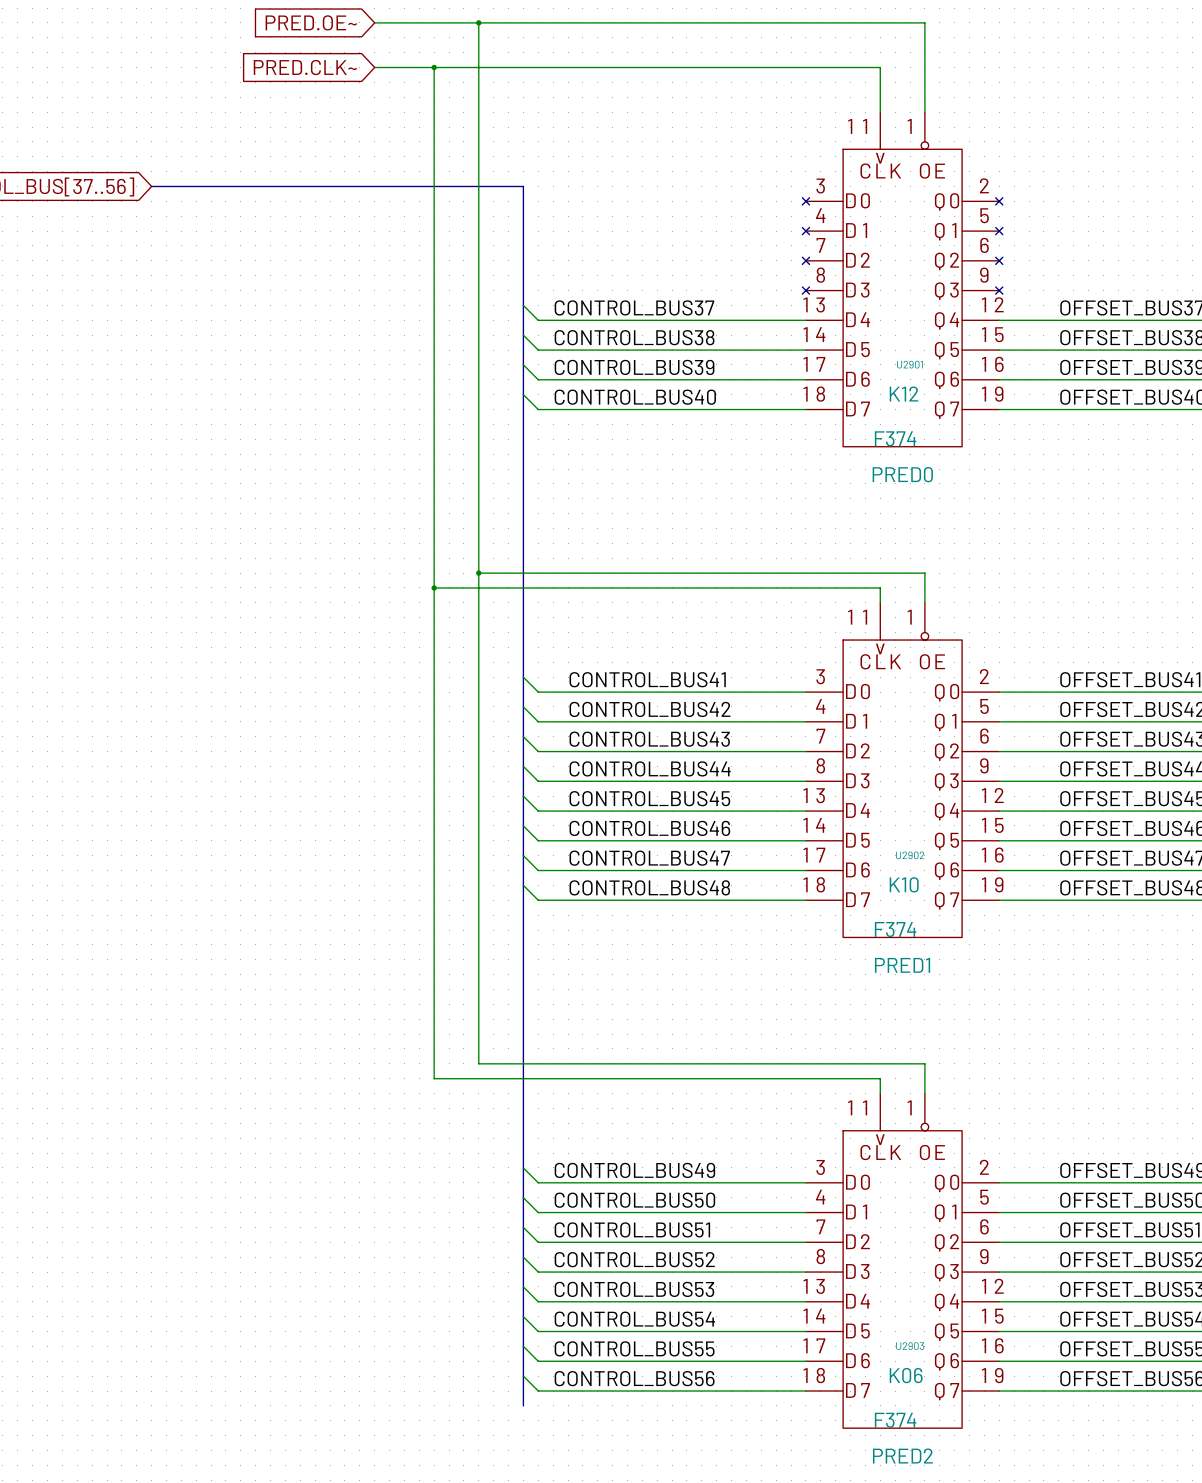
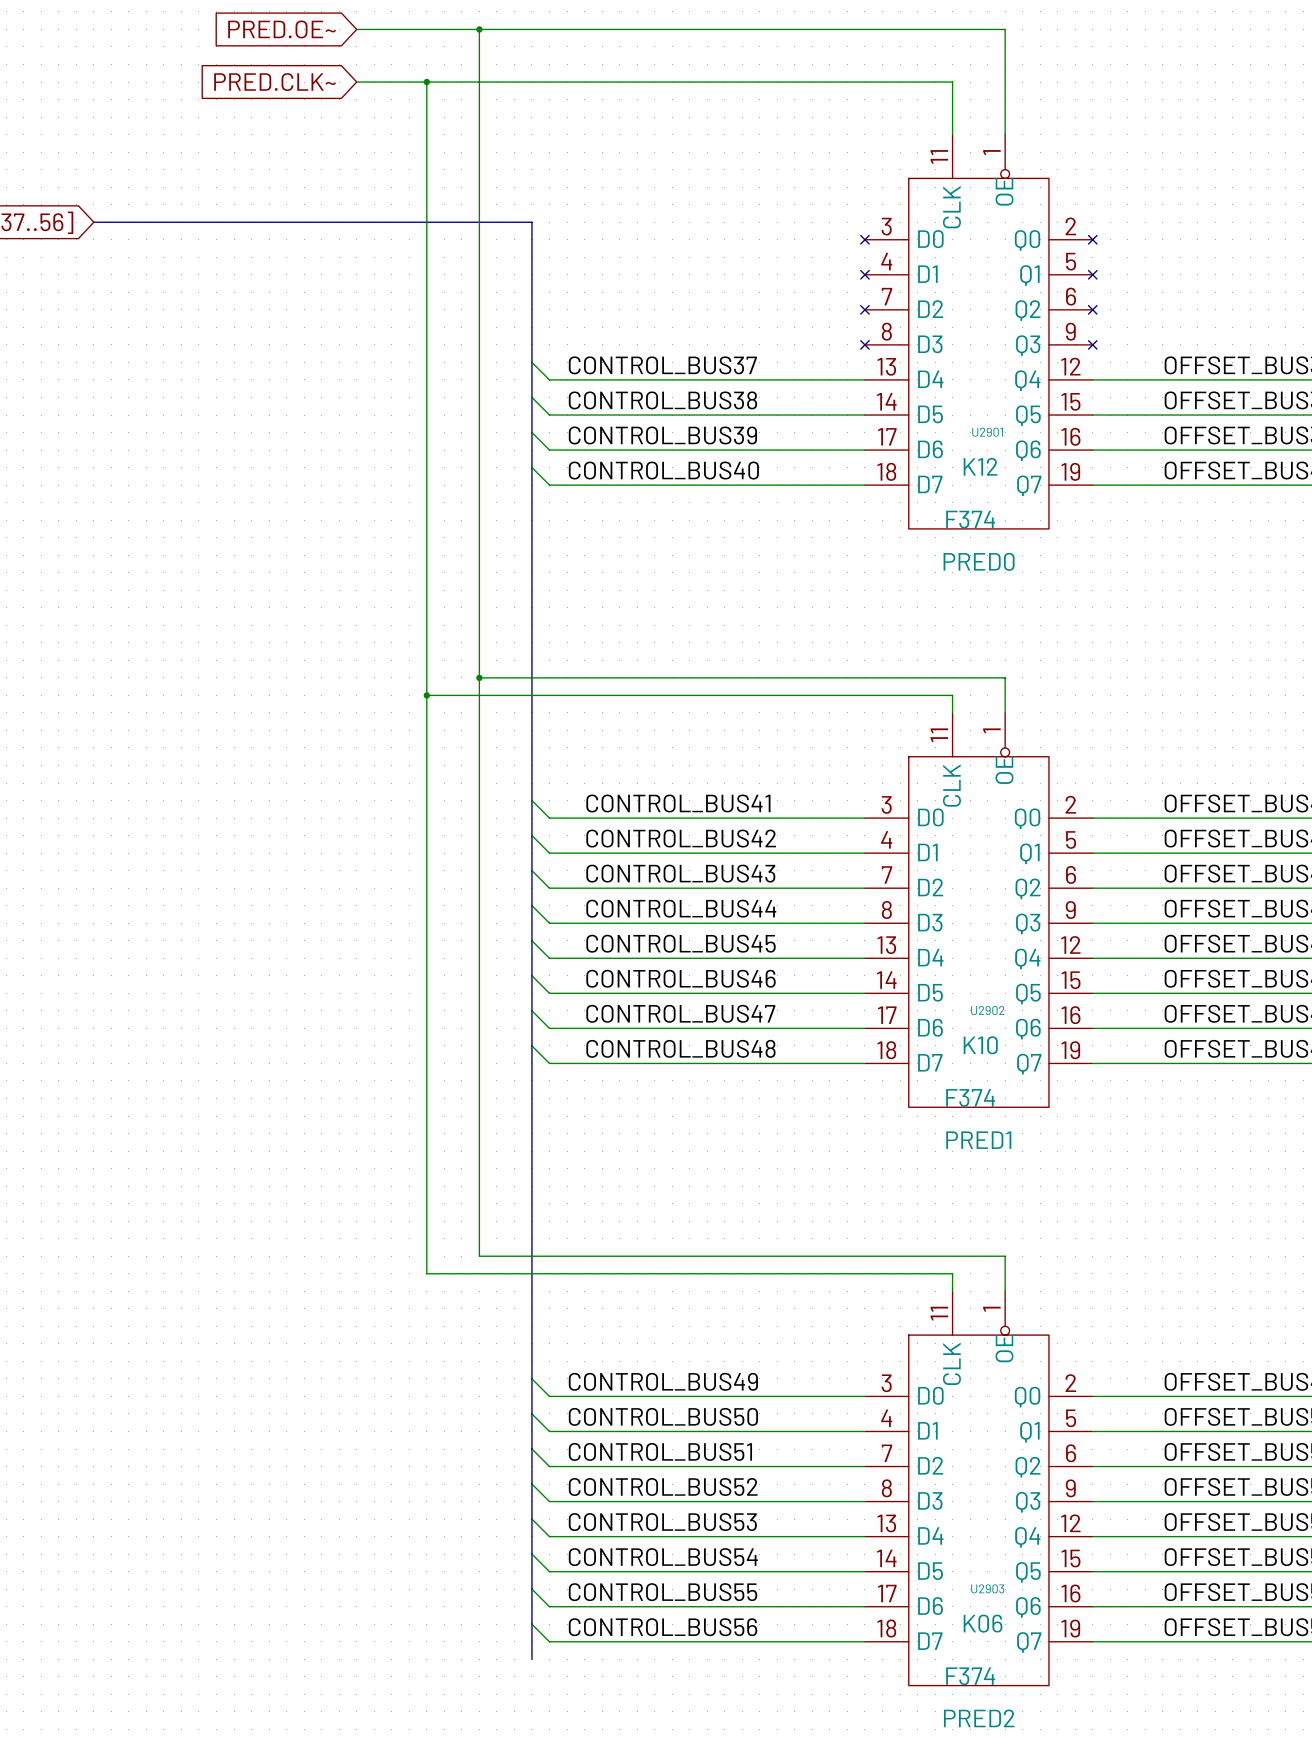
U2901 symbol: [805, 112, 1000, 447] -> [864, 134, 1093, 529]
U2902 symbol: [805, 602, 1000, 938] -> [864, 712, 1093, 1108]
U2903 symbol: [805, 1093, 1000, 1429] -> [864, 1291, 1093, 1686]

